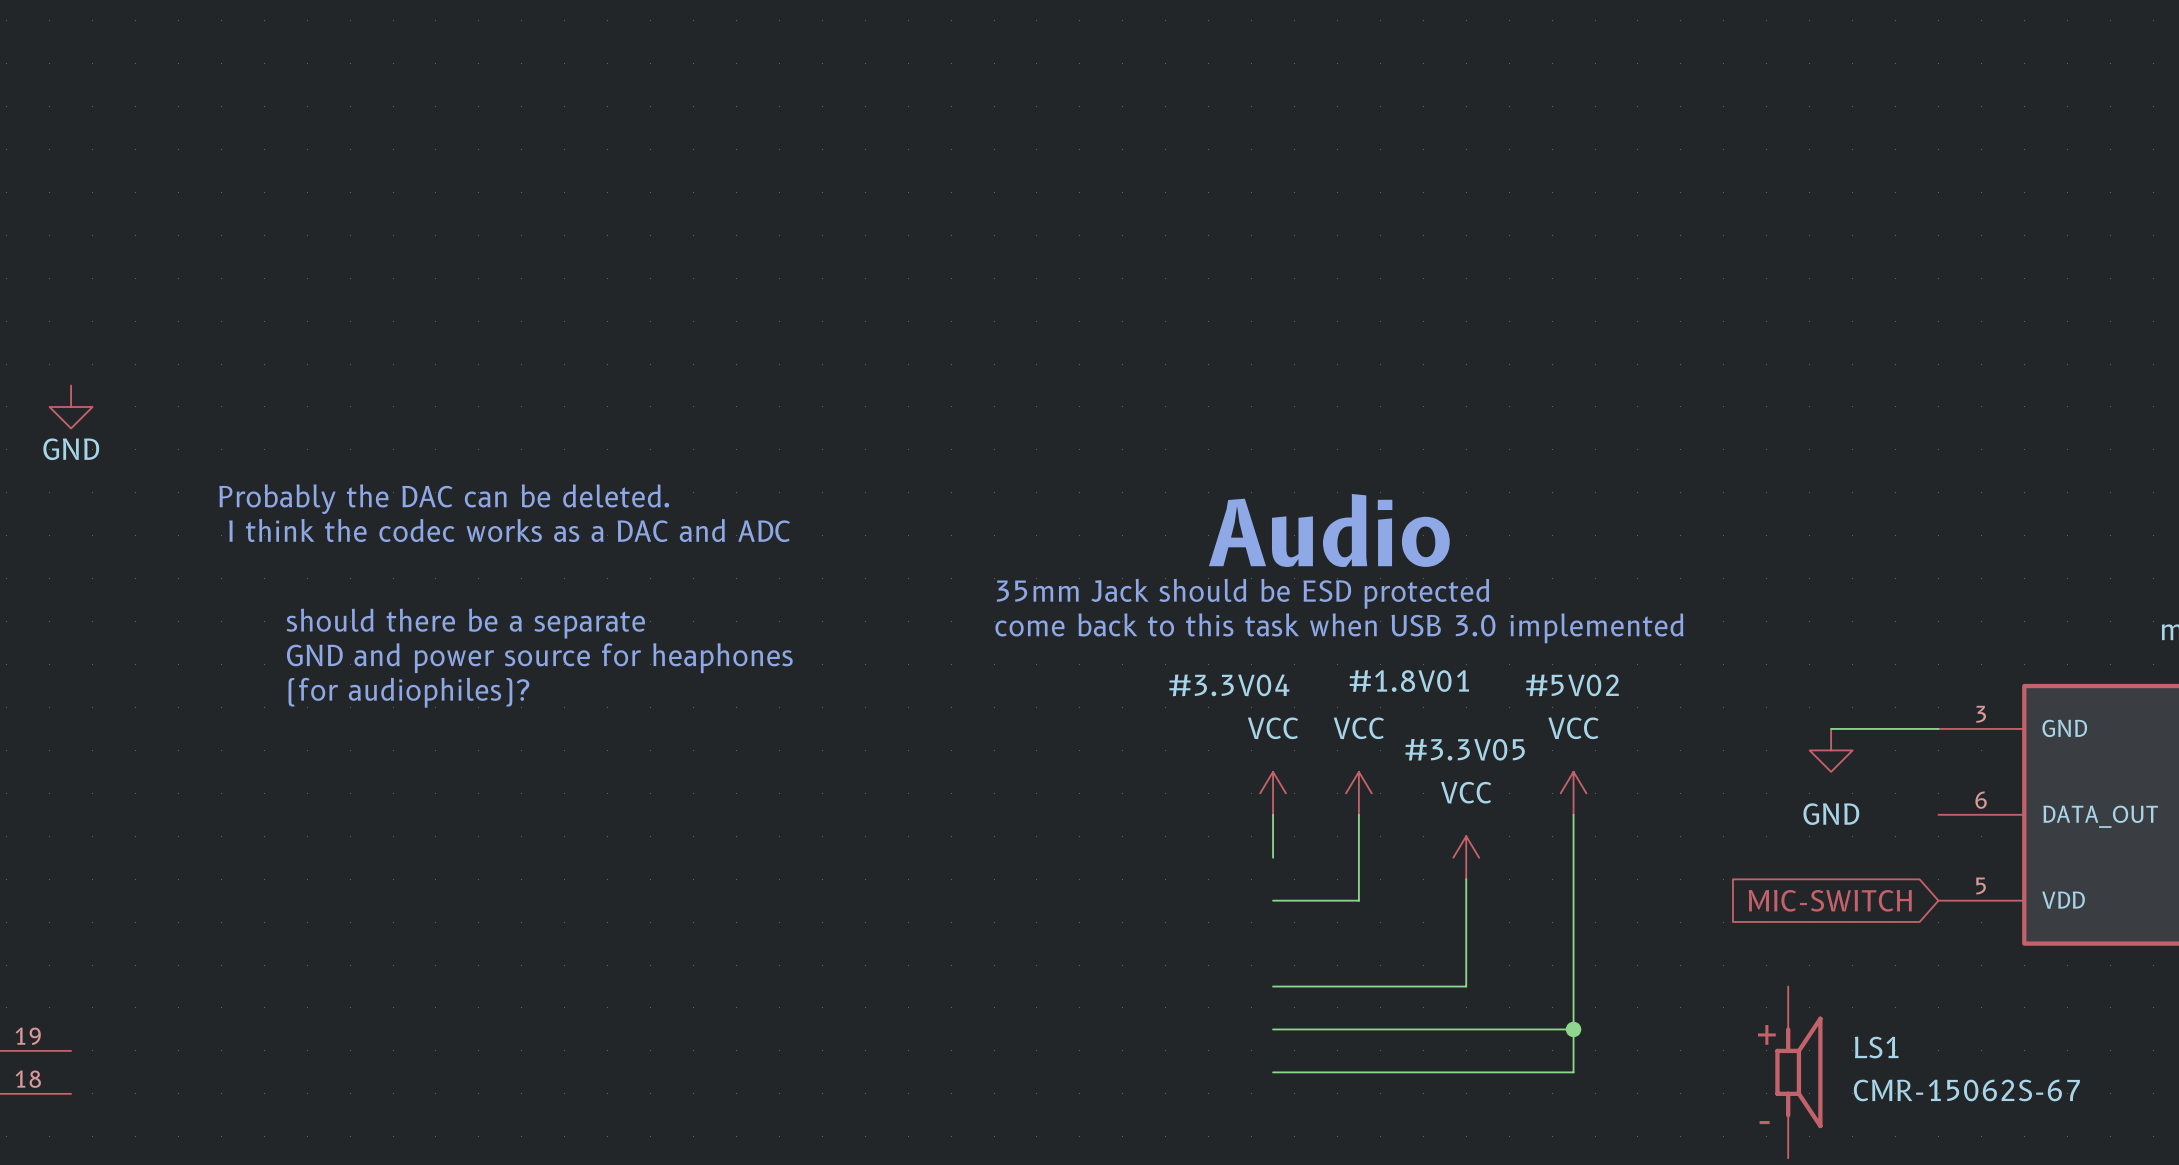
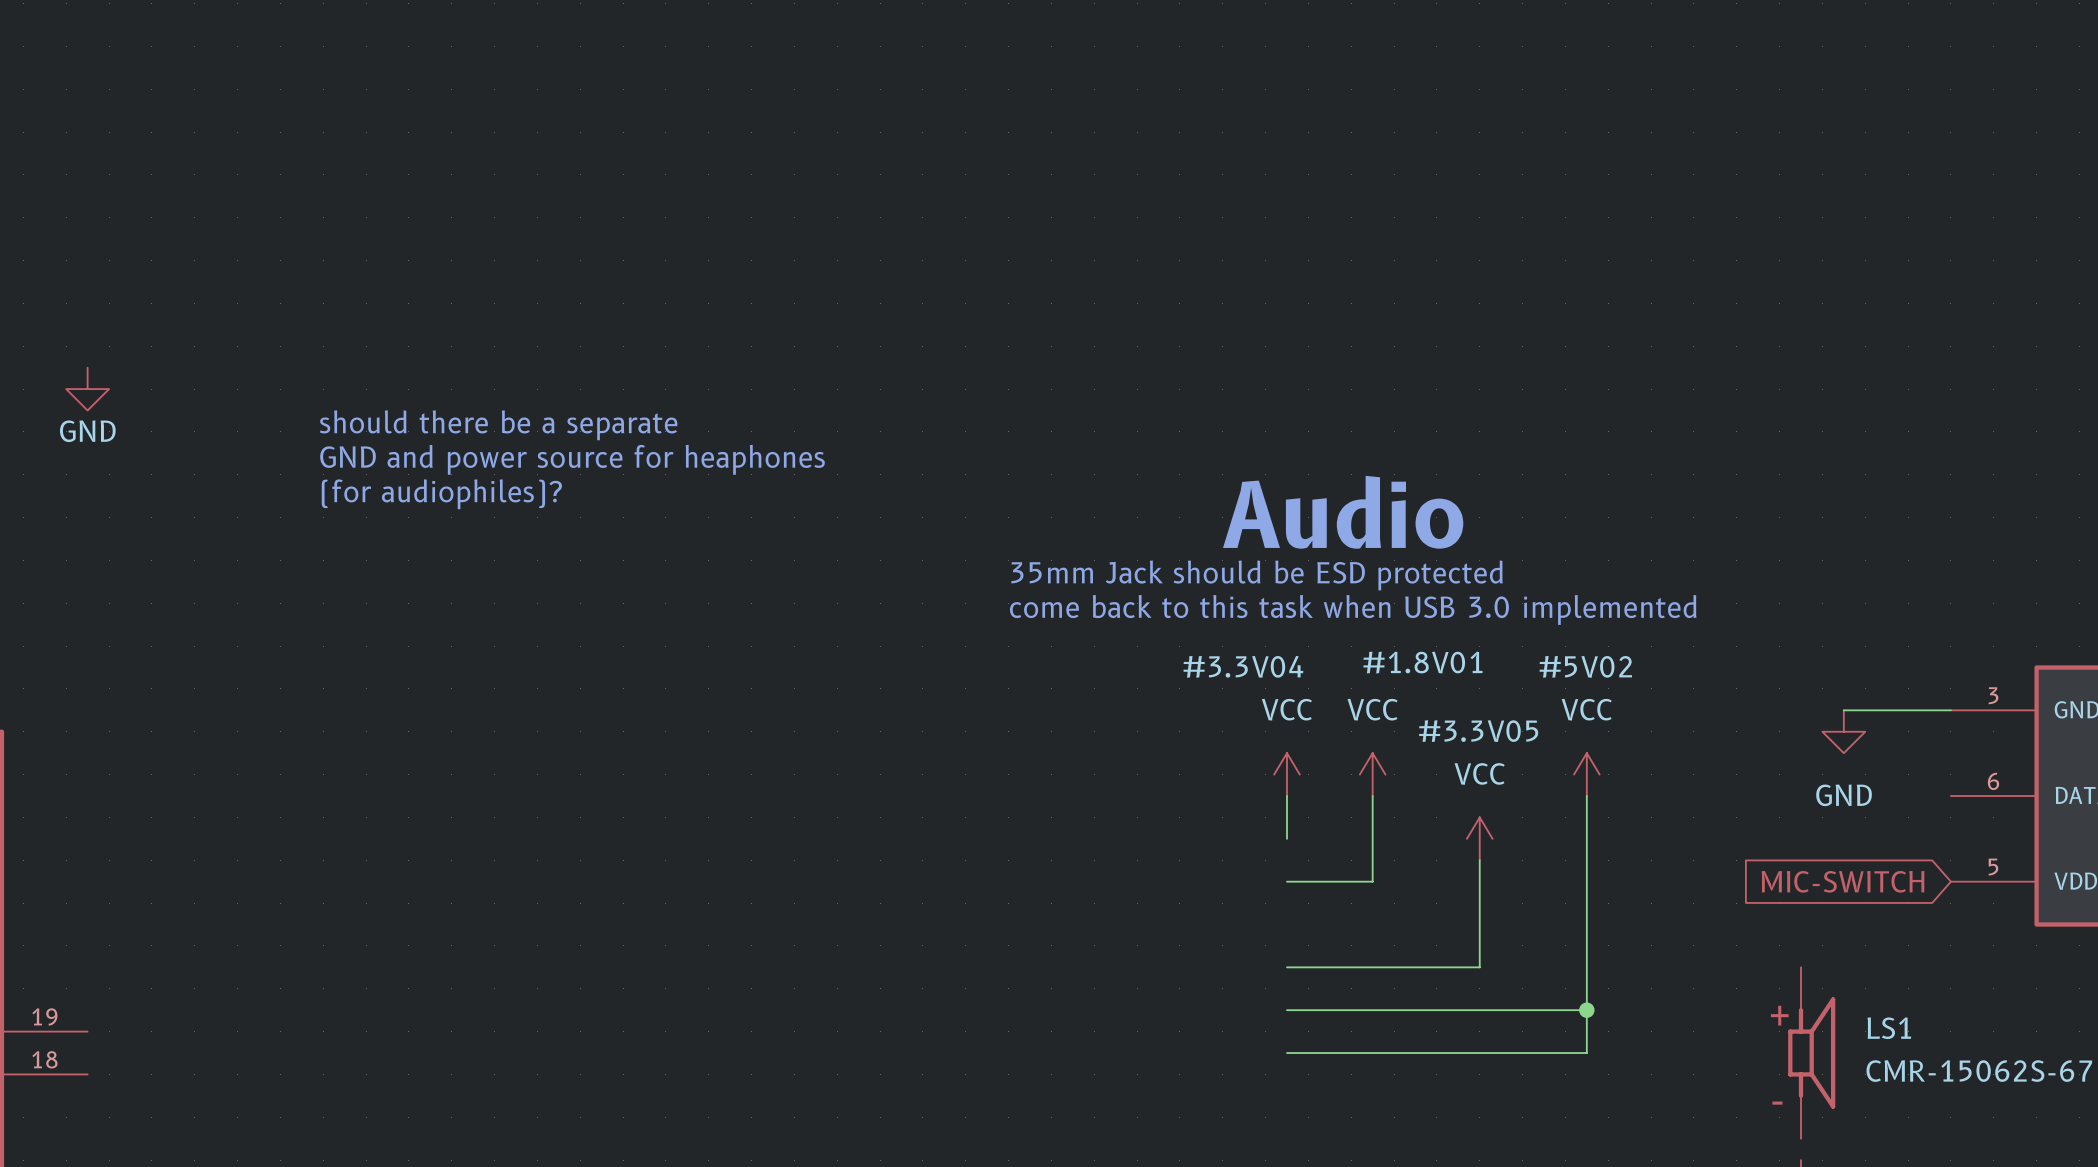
text: Probably the DAC can be deleted. (444, 499) -> none
text: I think the codec works as a DAC and ADC (509, 530) -> none
text position: should there be a separate (465, 623) -> should there be a separate (498, 425)
text position: GND and power source for heaphones (539, 658) -> GND and power source for heaphones (572, 459)
text position: (for audiophiles)? (408, 692) -> (for audiophiles)? (441, 494)

